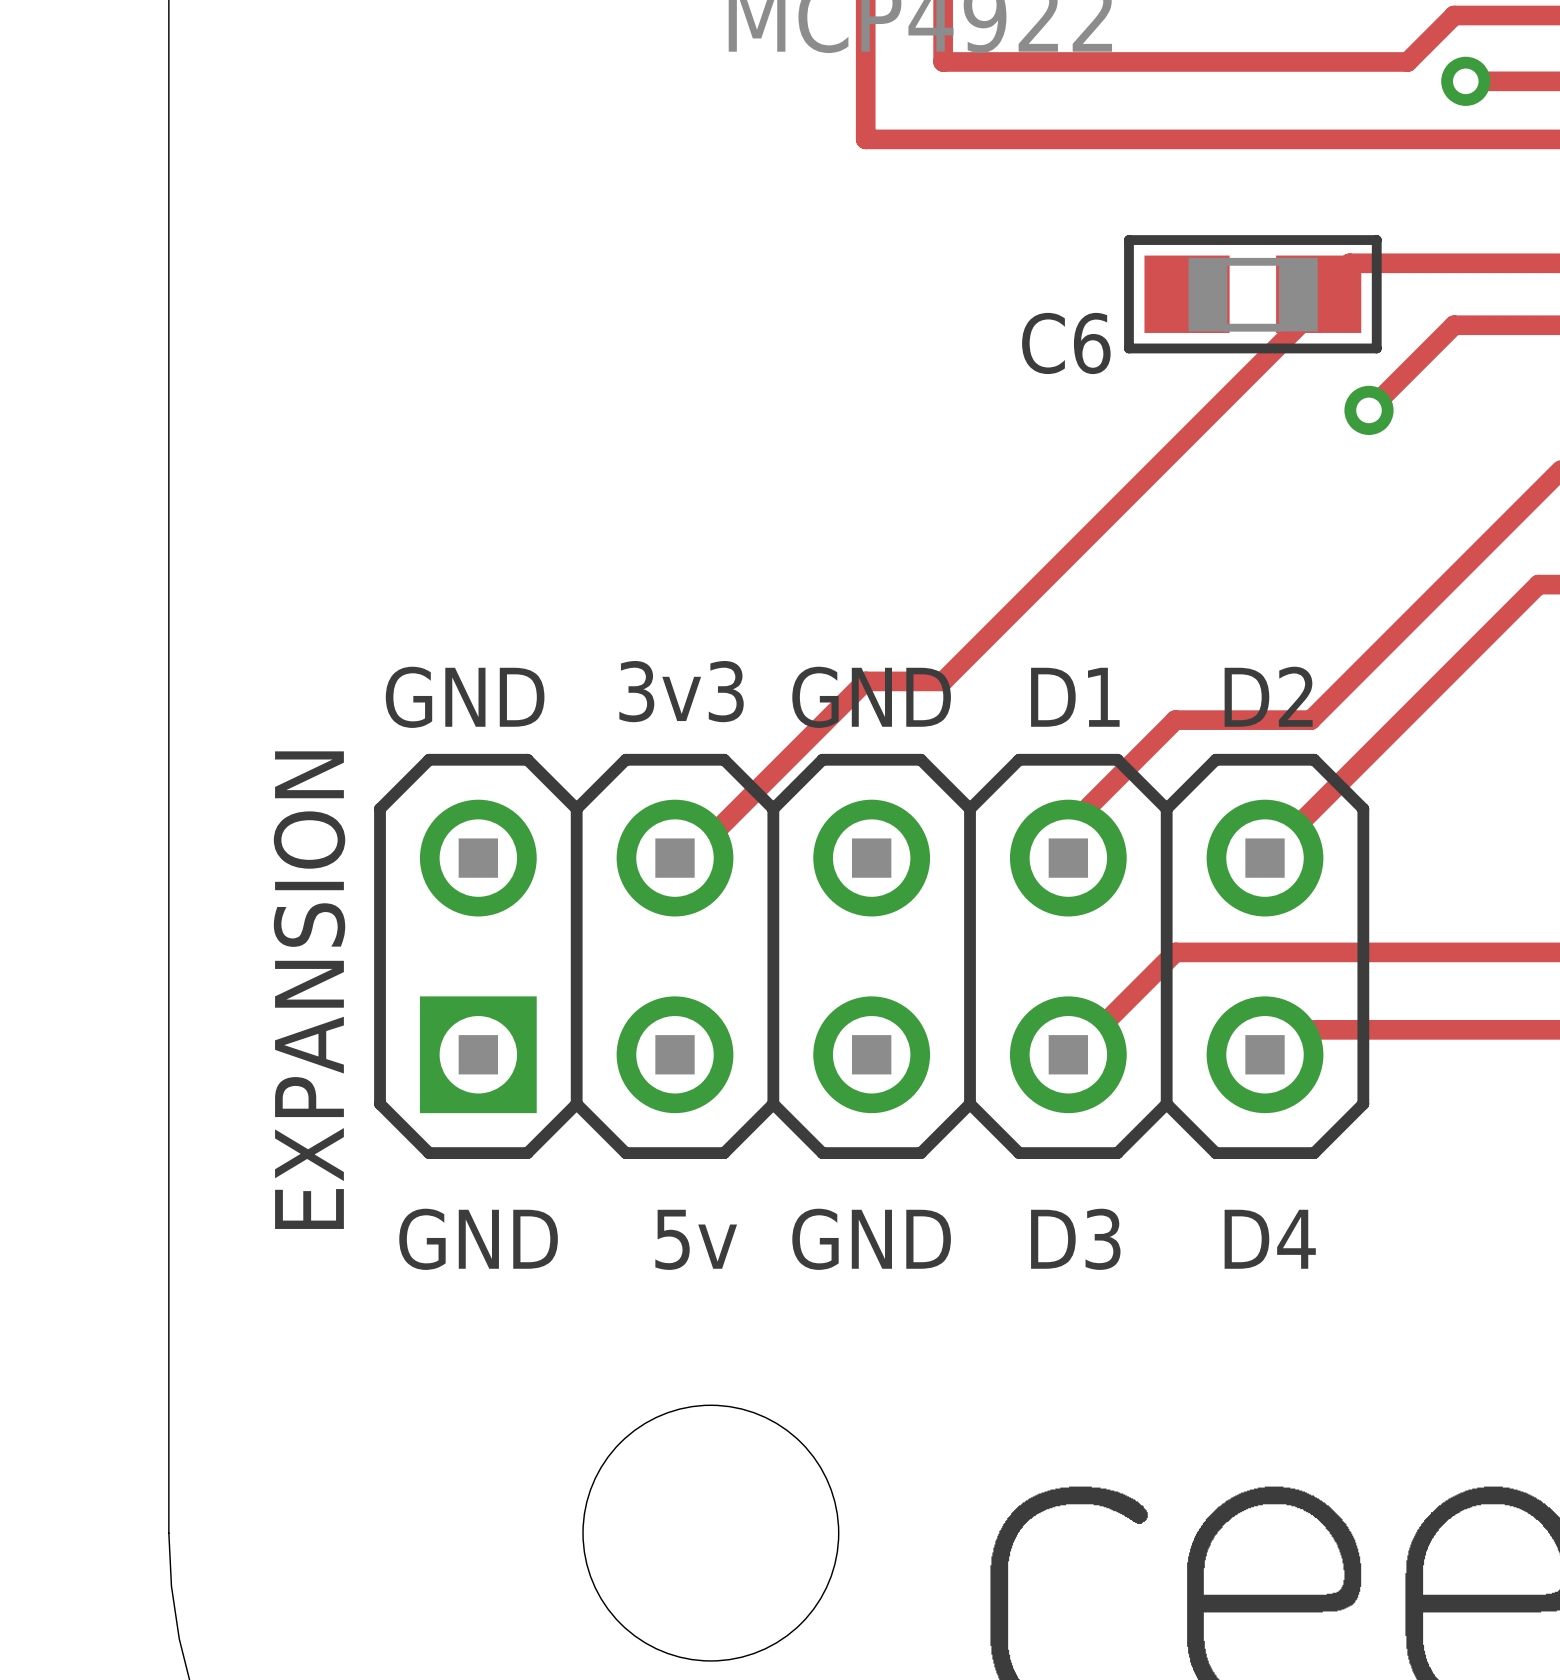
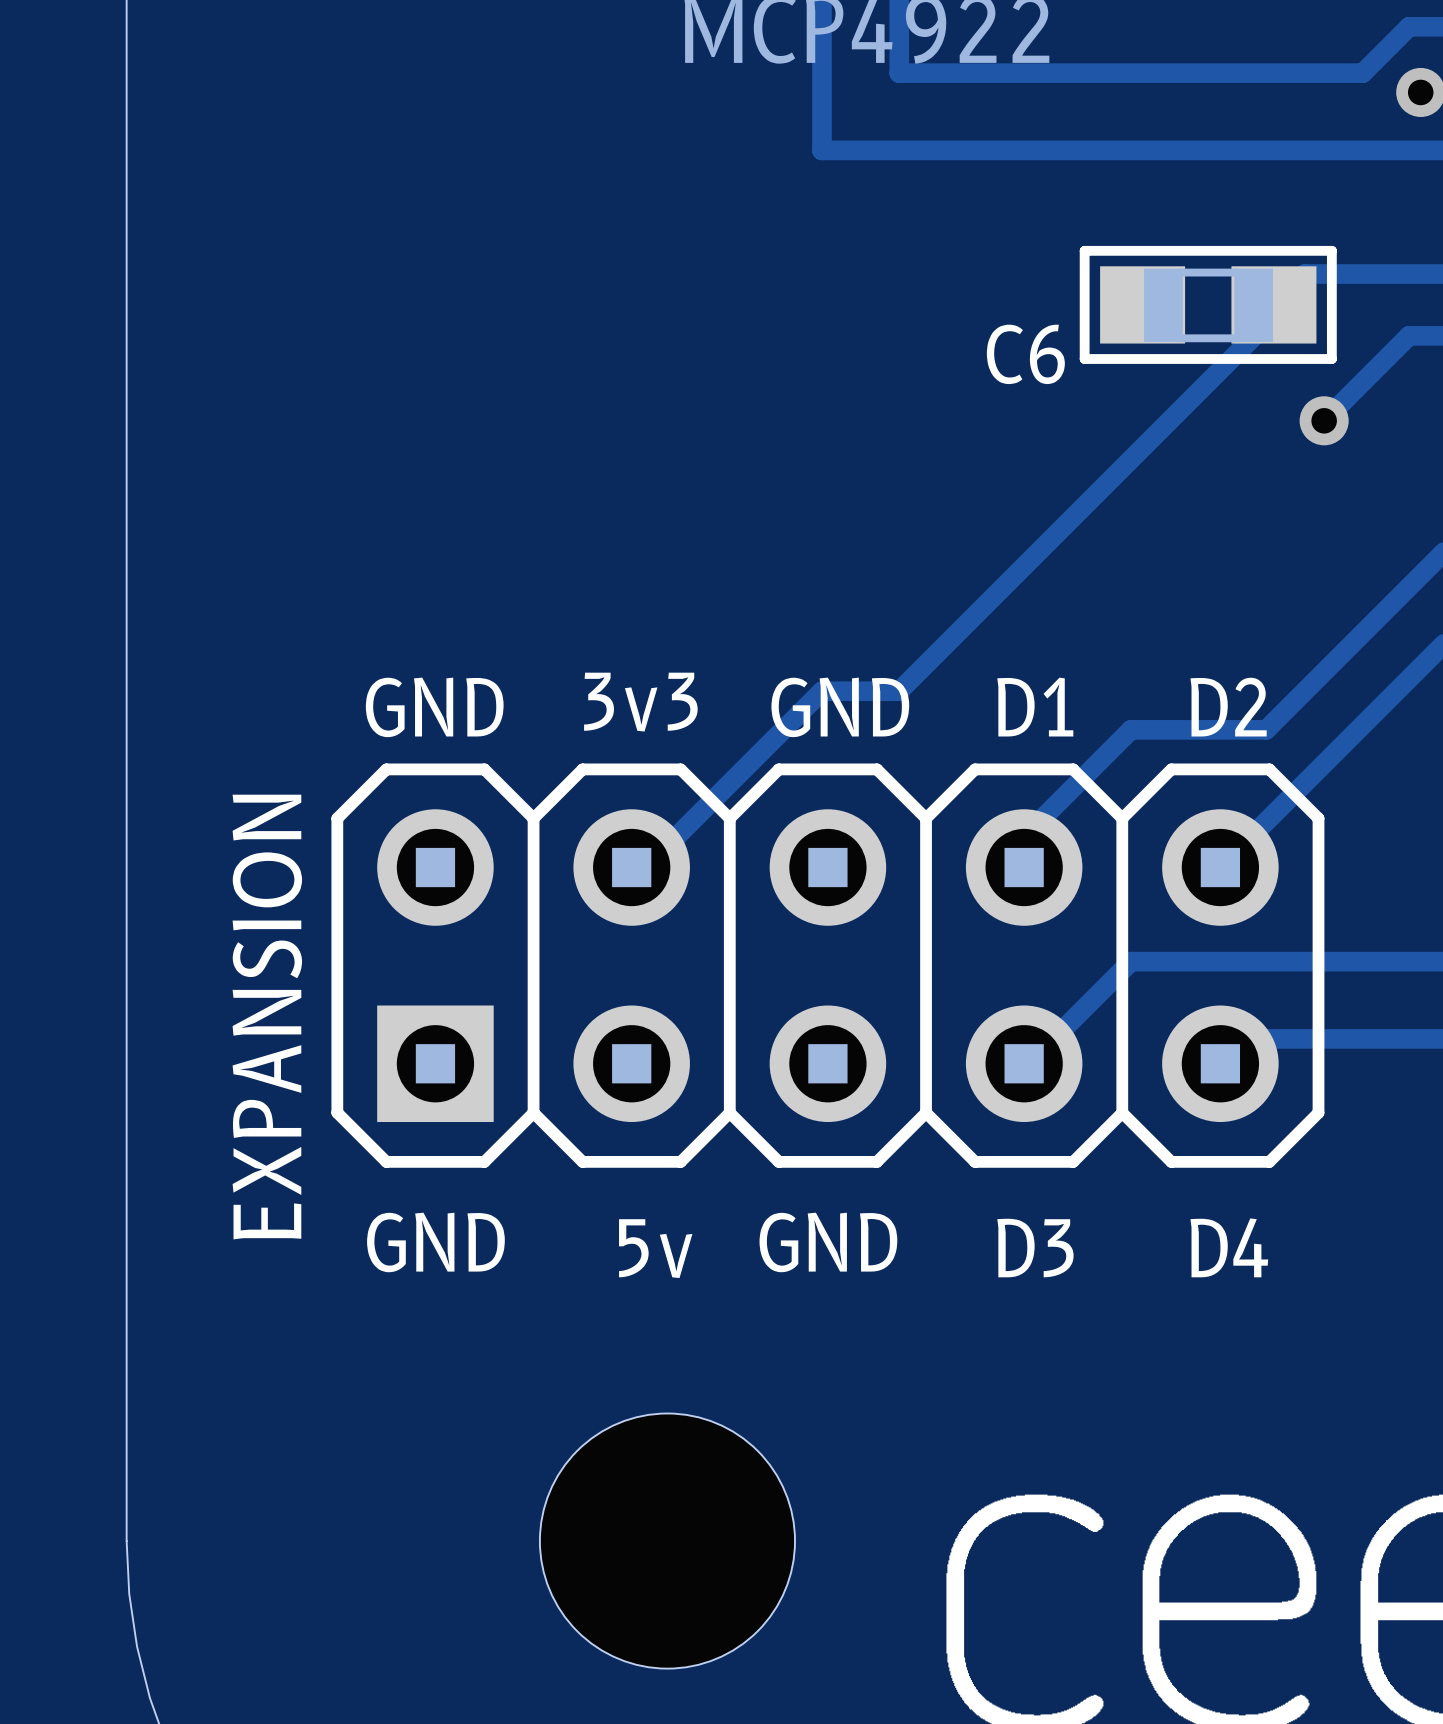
text position: GND (478, 1239) -> GND (435, 1242)
text position: GND (871, 1239) -> GND (828, 1242)

